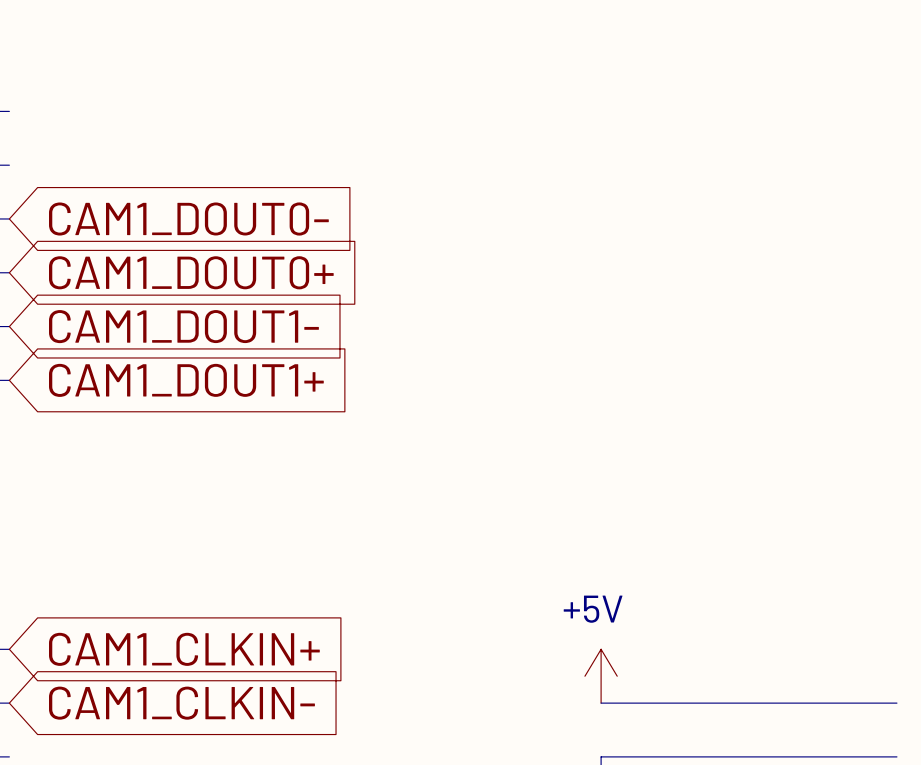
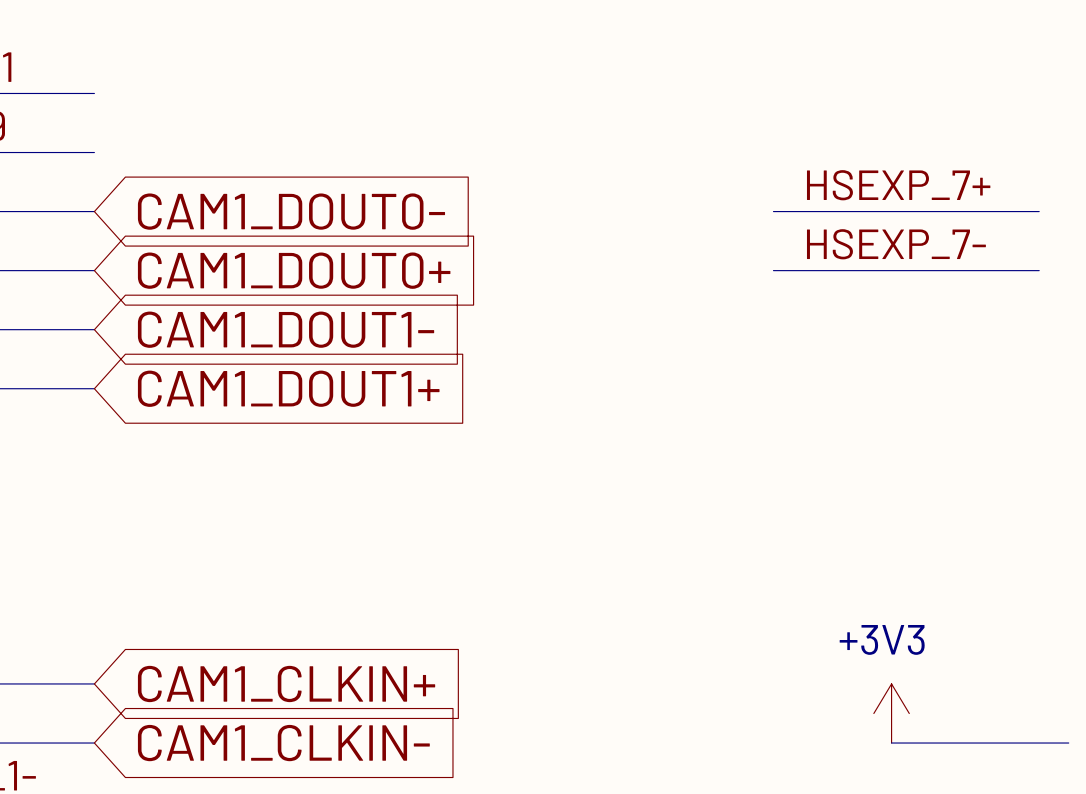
label: none -> HSEXP_7+ (898, 185)
wire: none -> (773, 211) (1039, 211)
label: none -> HSEXP_7- (896, 244)
wire: none -> (773, 270) (1039, 270)
power symbol: +5V (601, 676) -> none
power symbol: none -> +3V3 (891, 713)
wire: (601, 703) (735, 703) -> none

